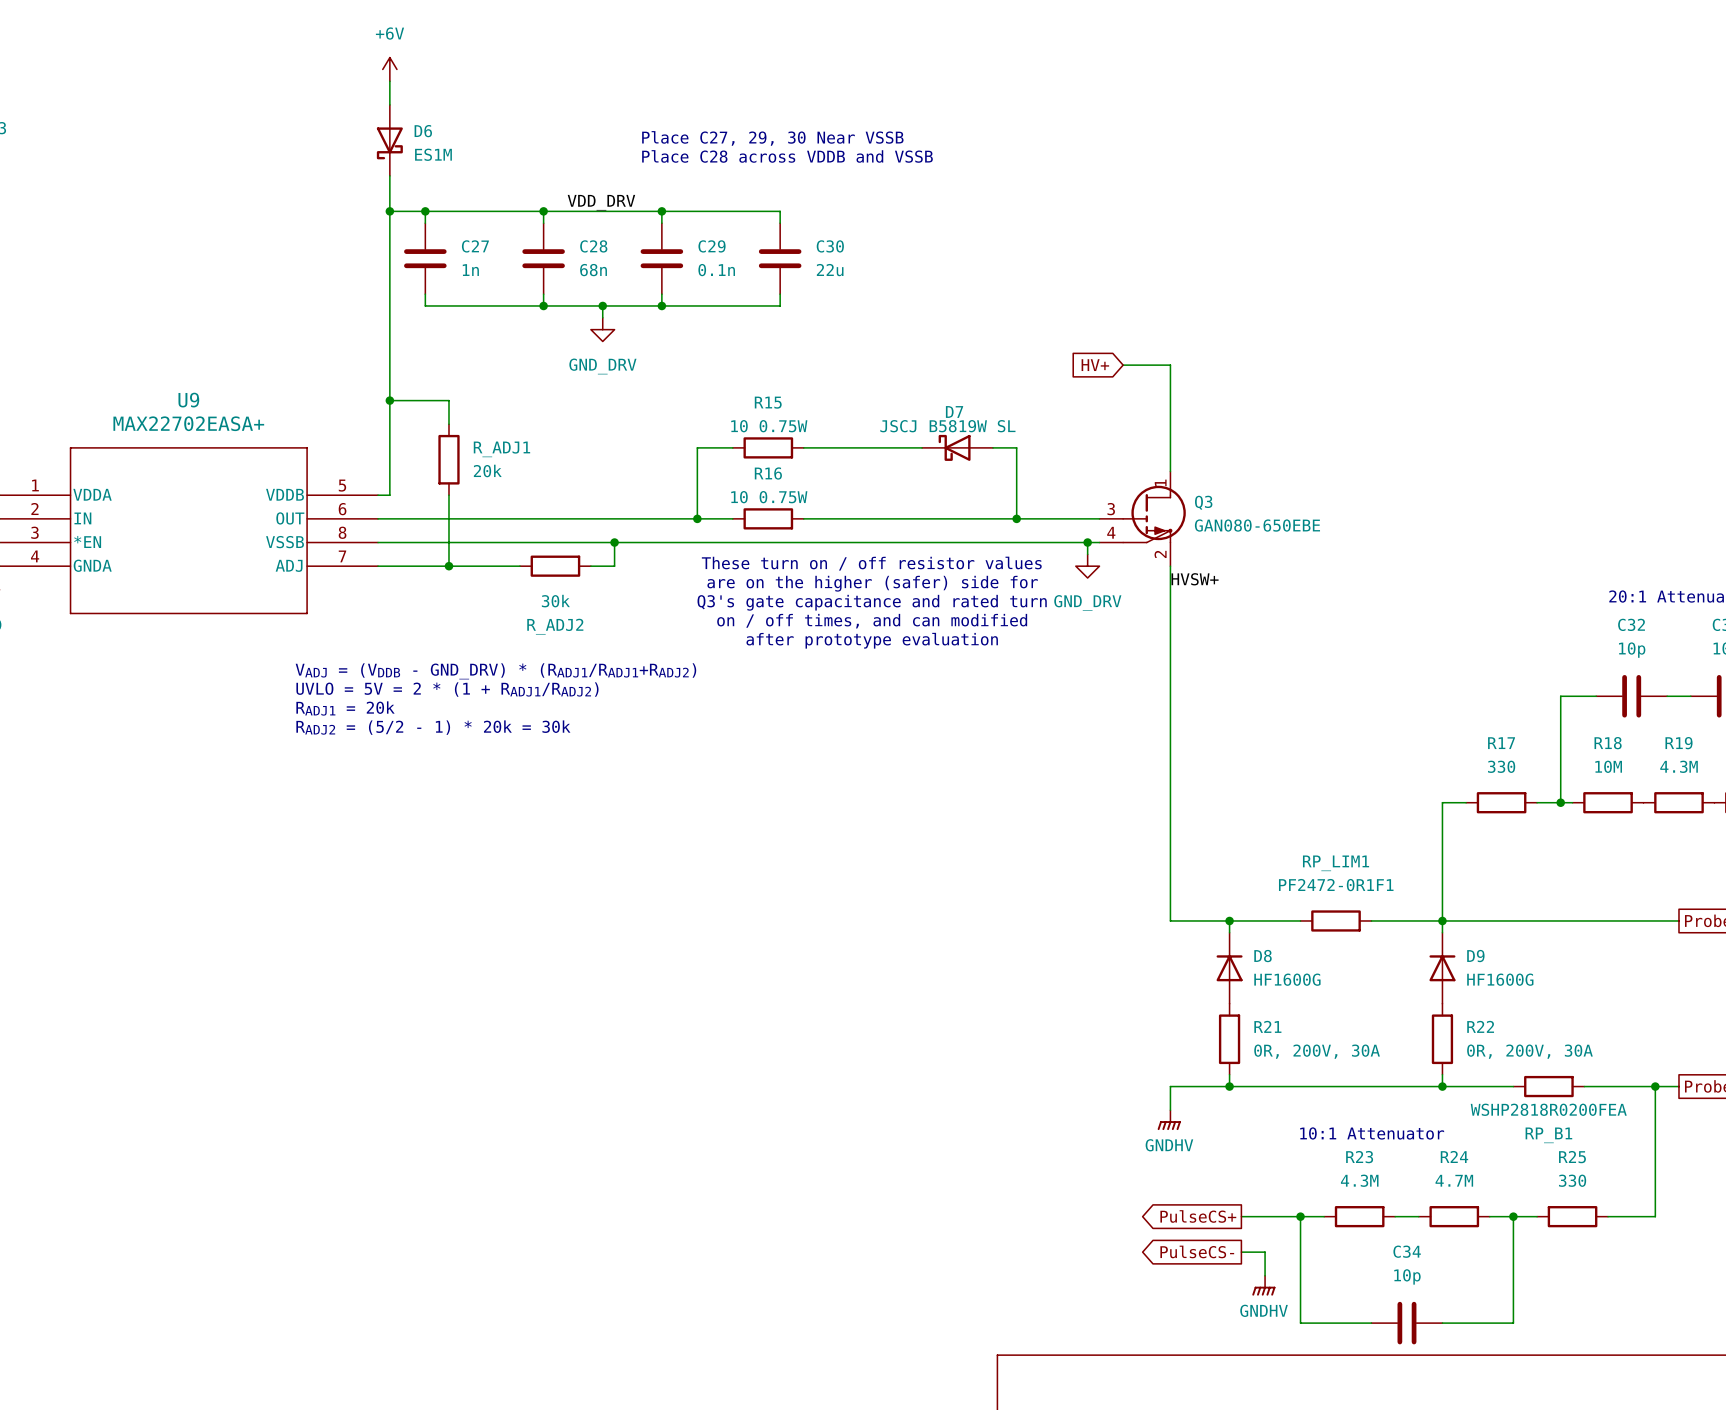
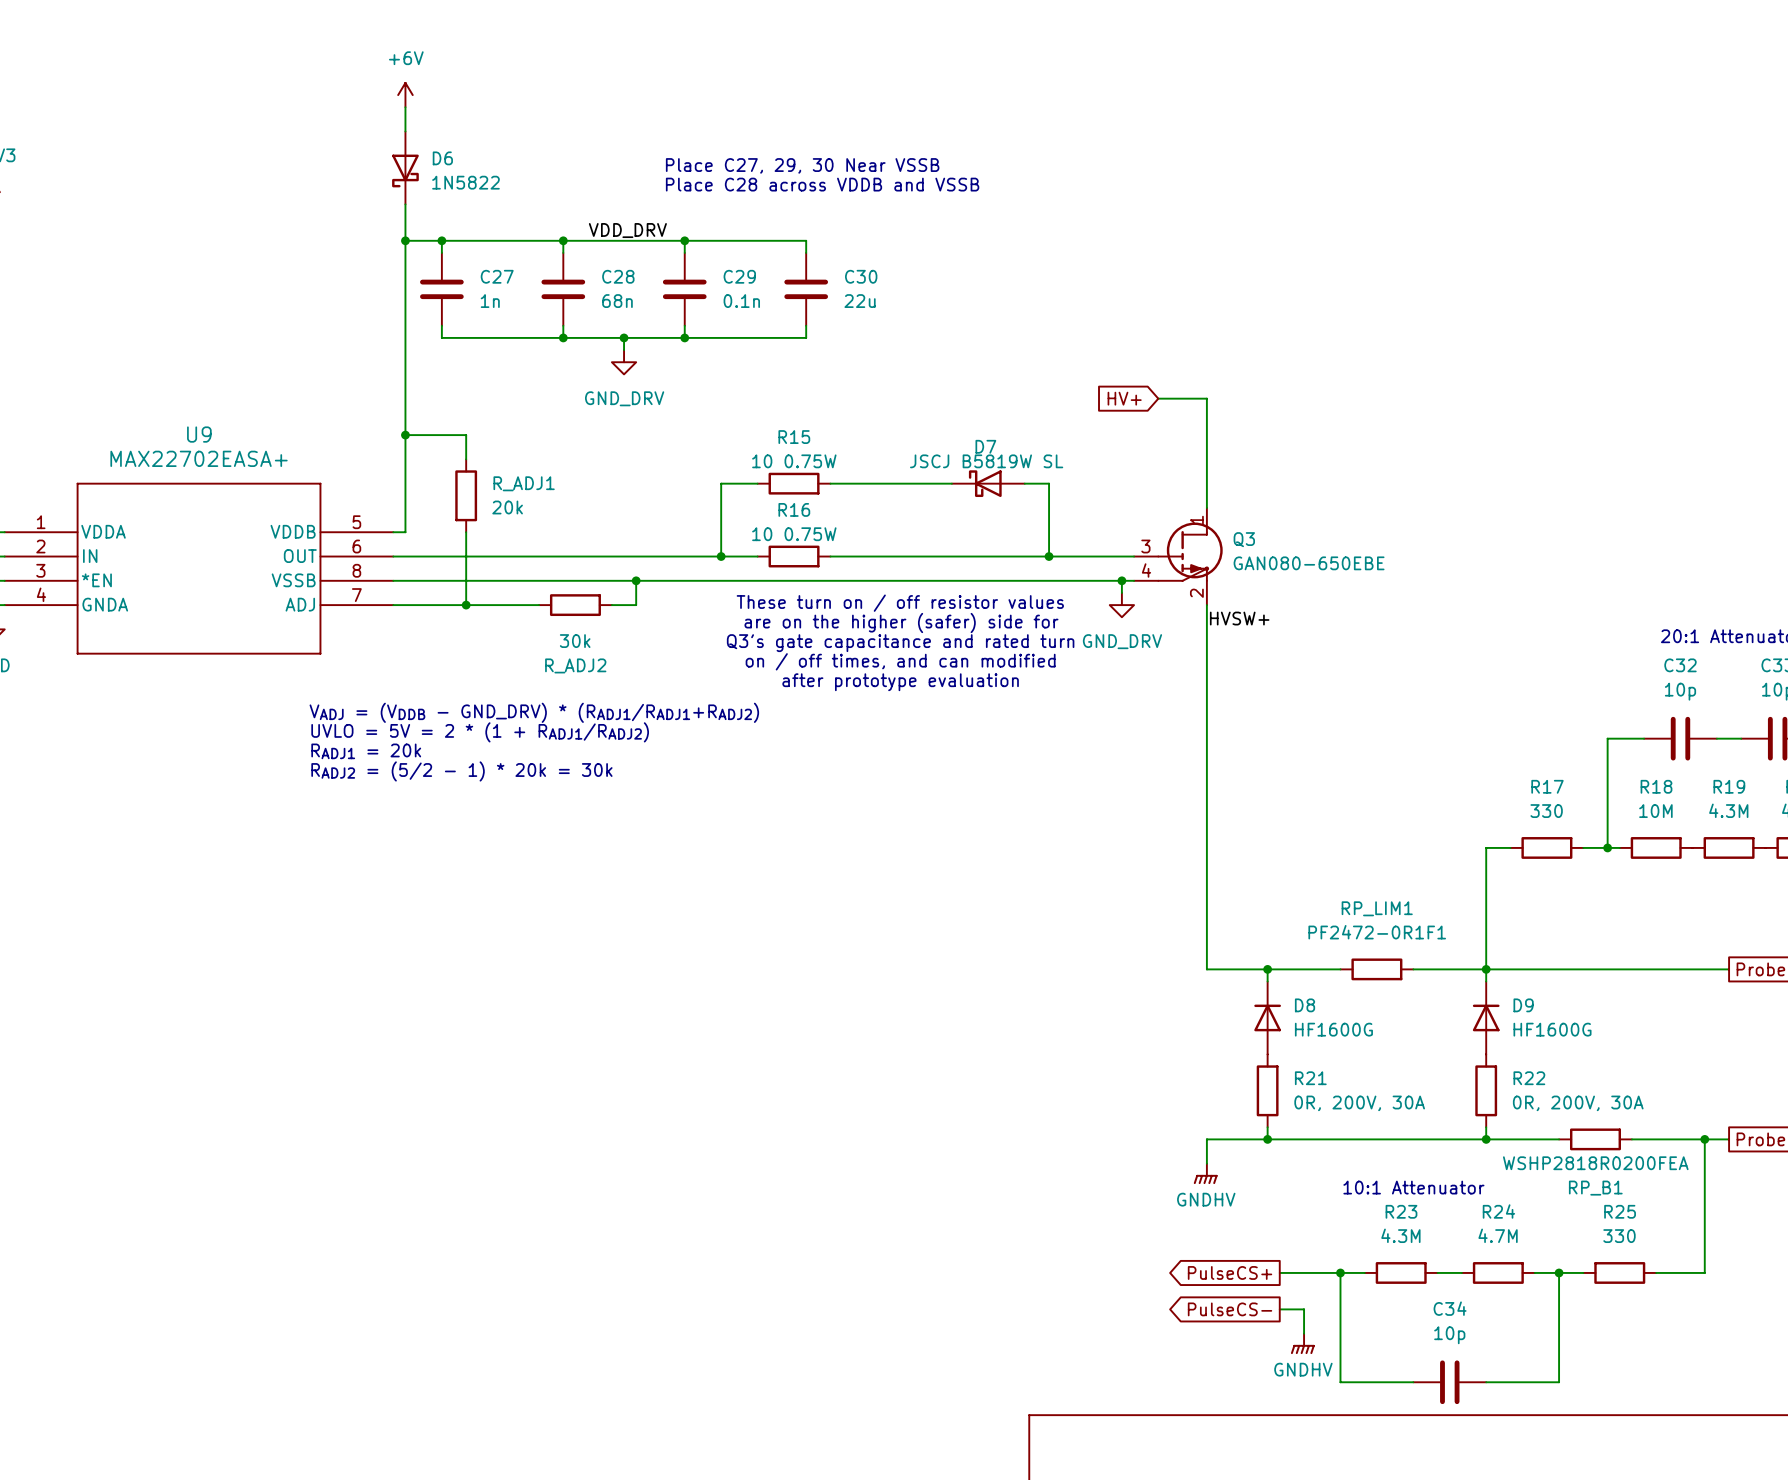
D6 value: ES1M (433, 154) -> 1N5822 (465, 182)

